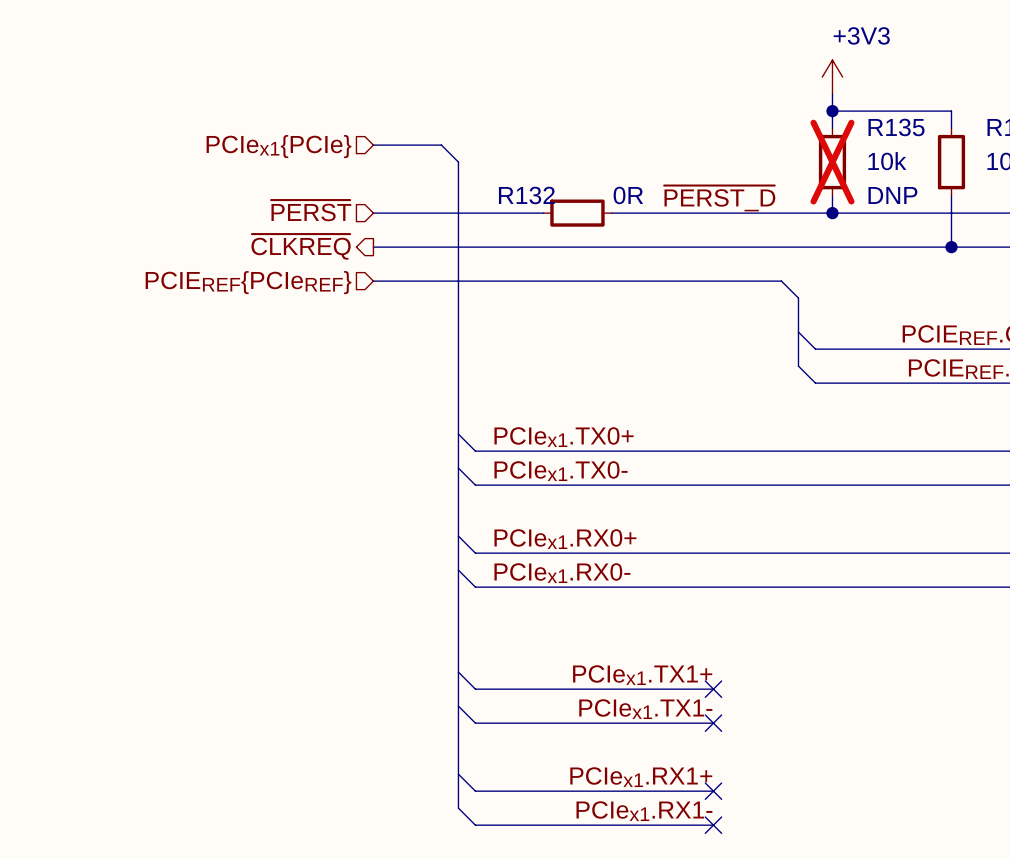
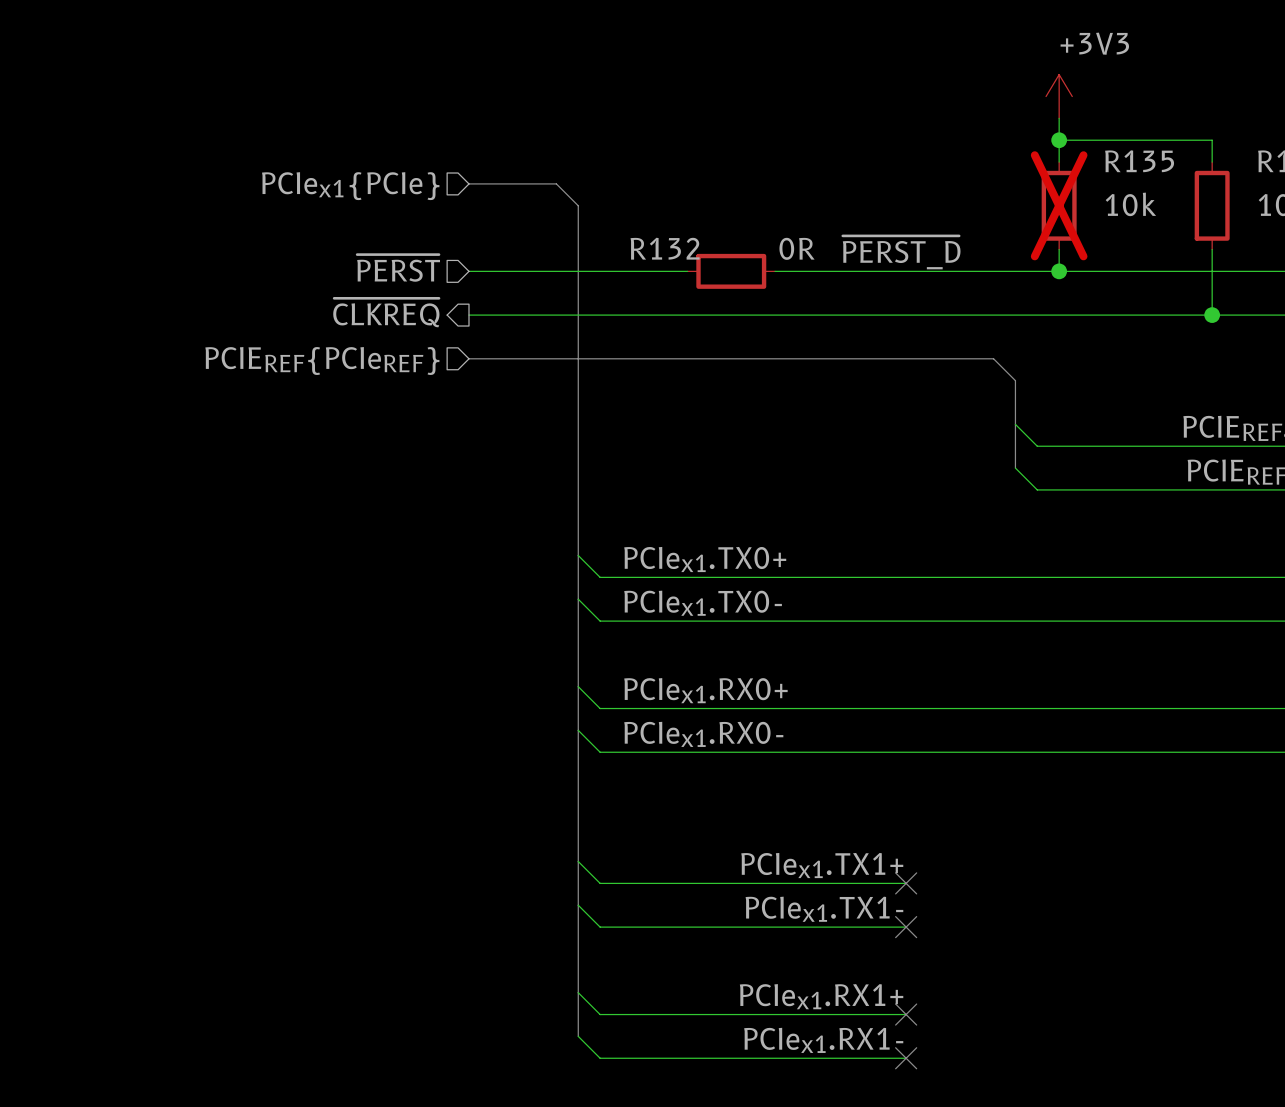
R135 text: DNP (892, 195) -> none

